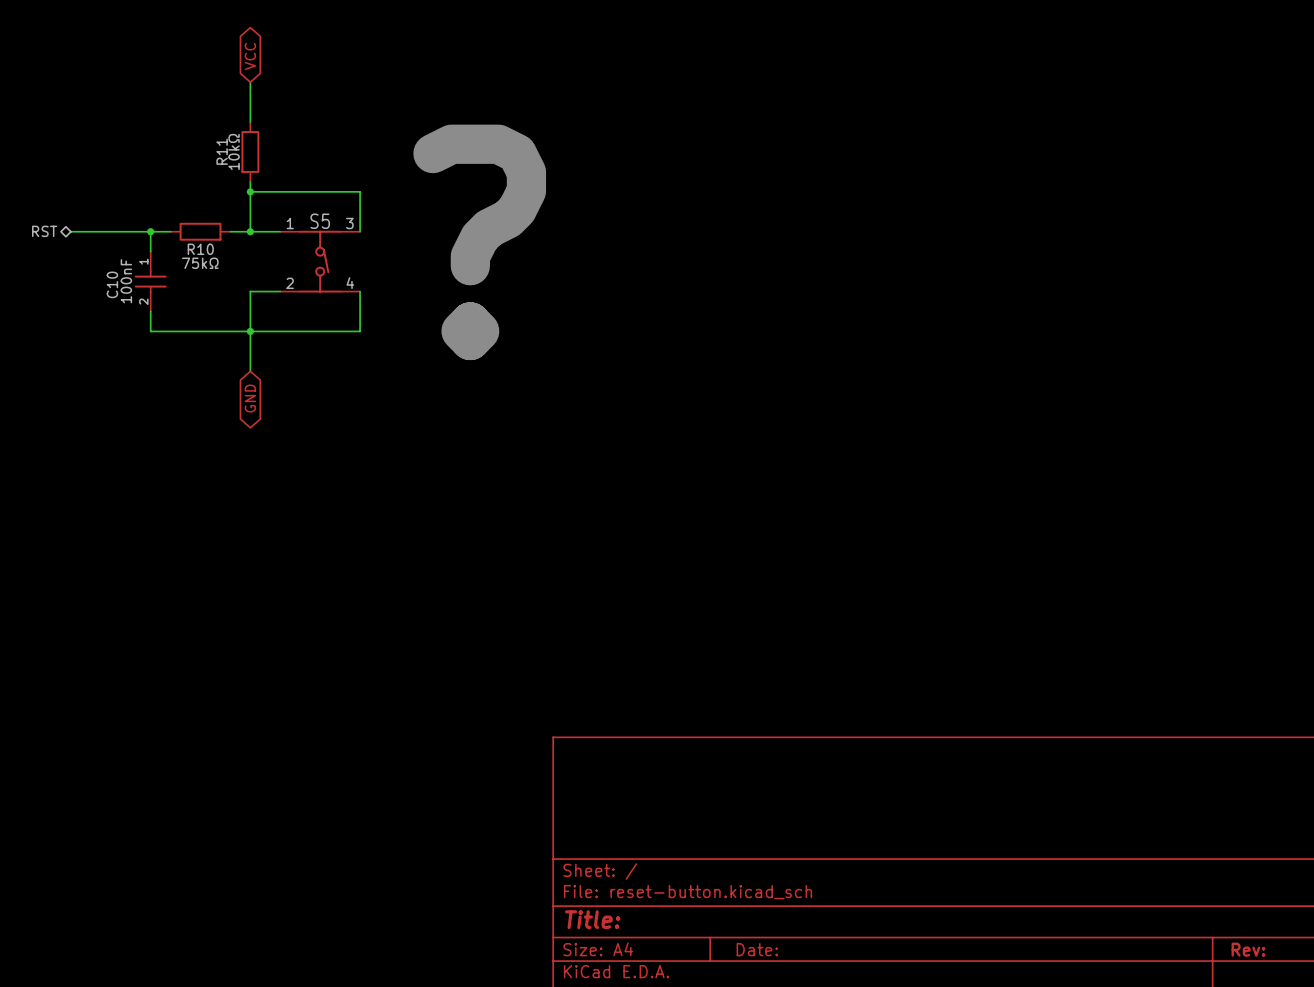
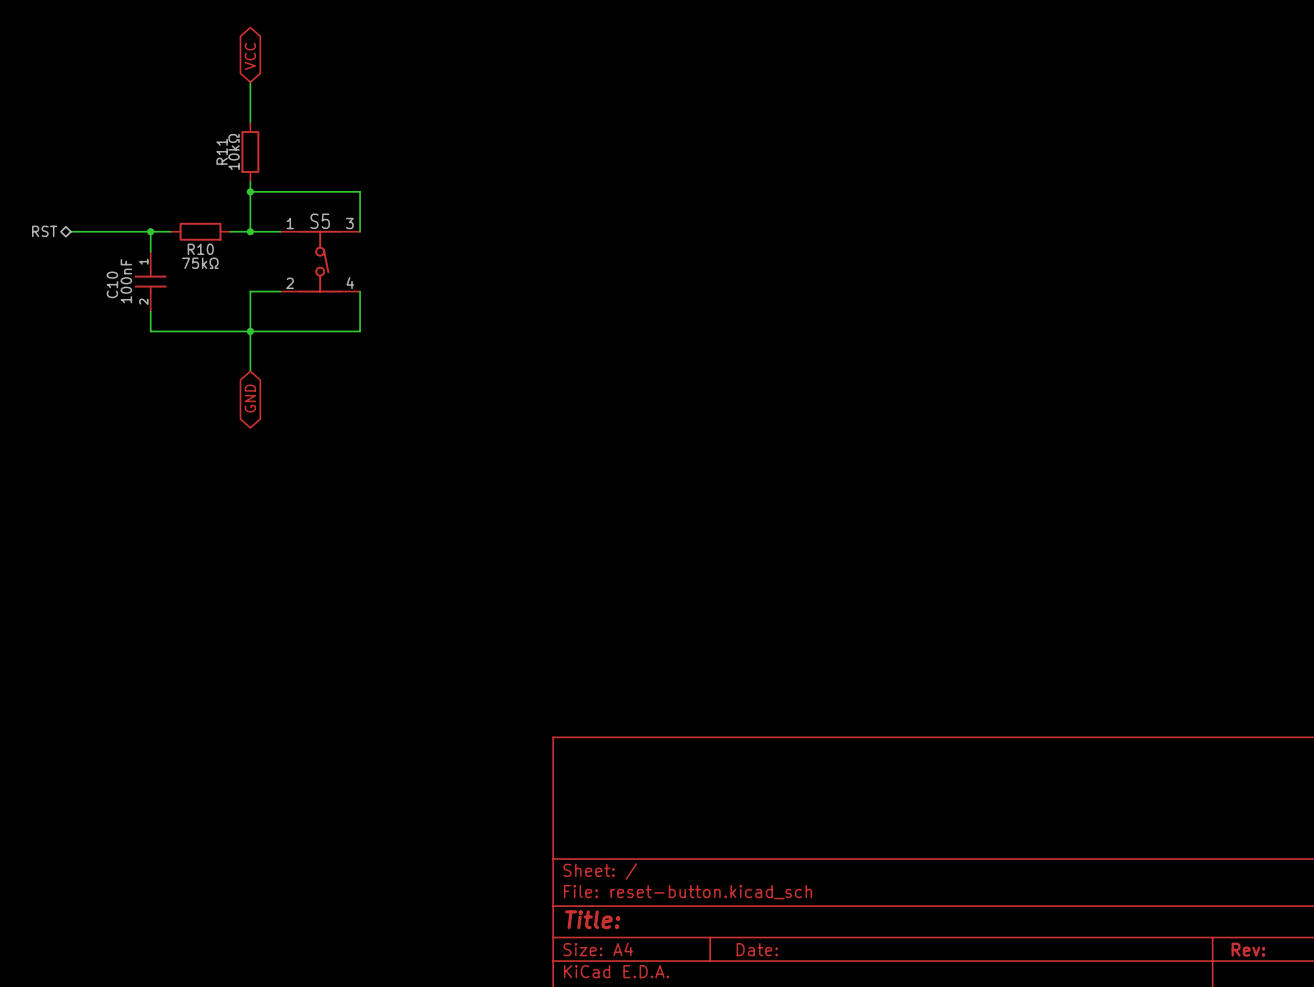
text: ? (479, 242) -> none

